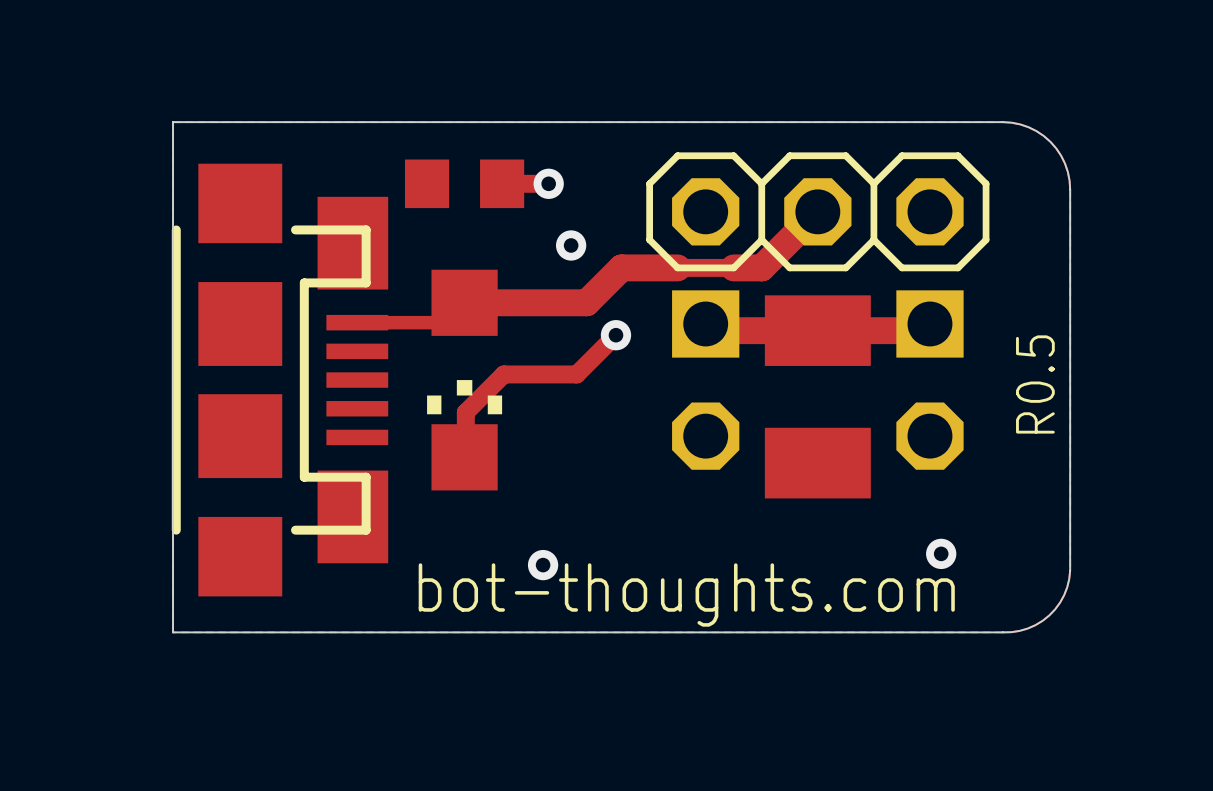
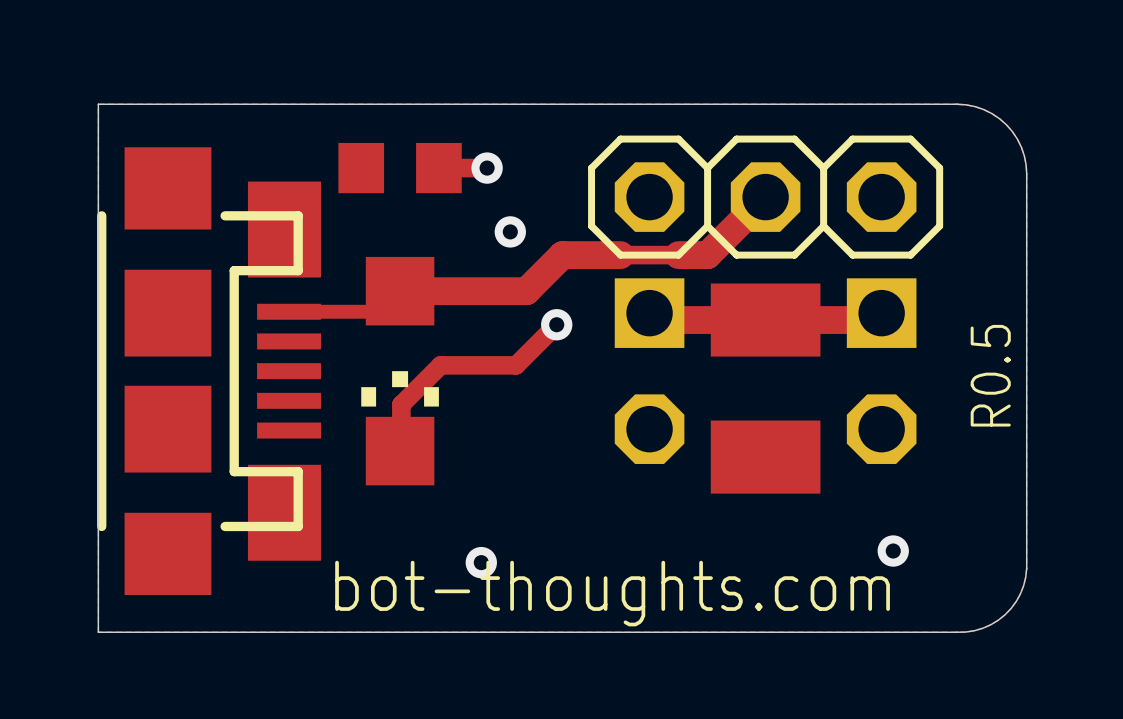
text position: bot-thoughts.com (686, 595) -> bot-thoughts.com (612, 593)

